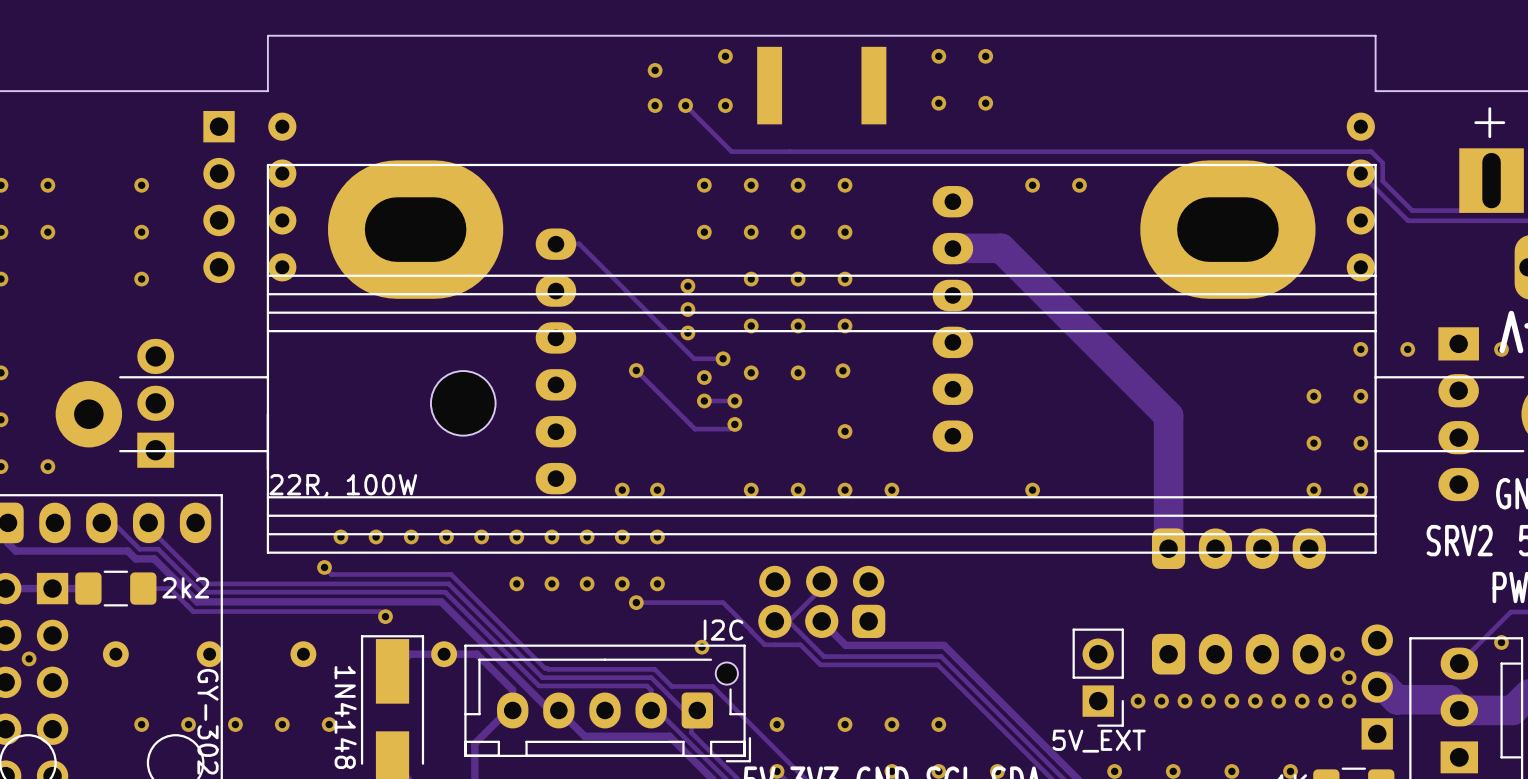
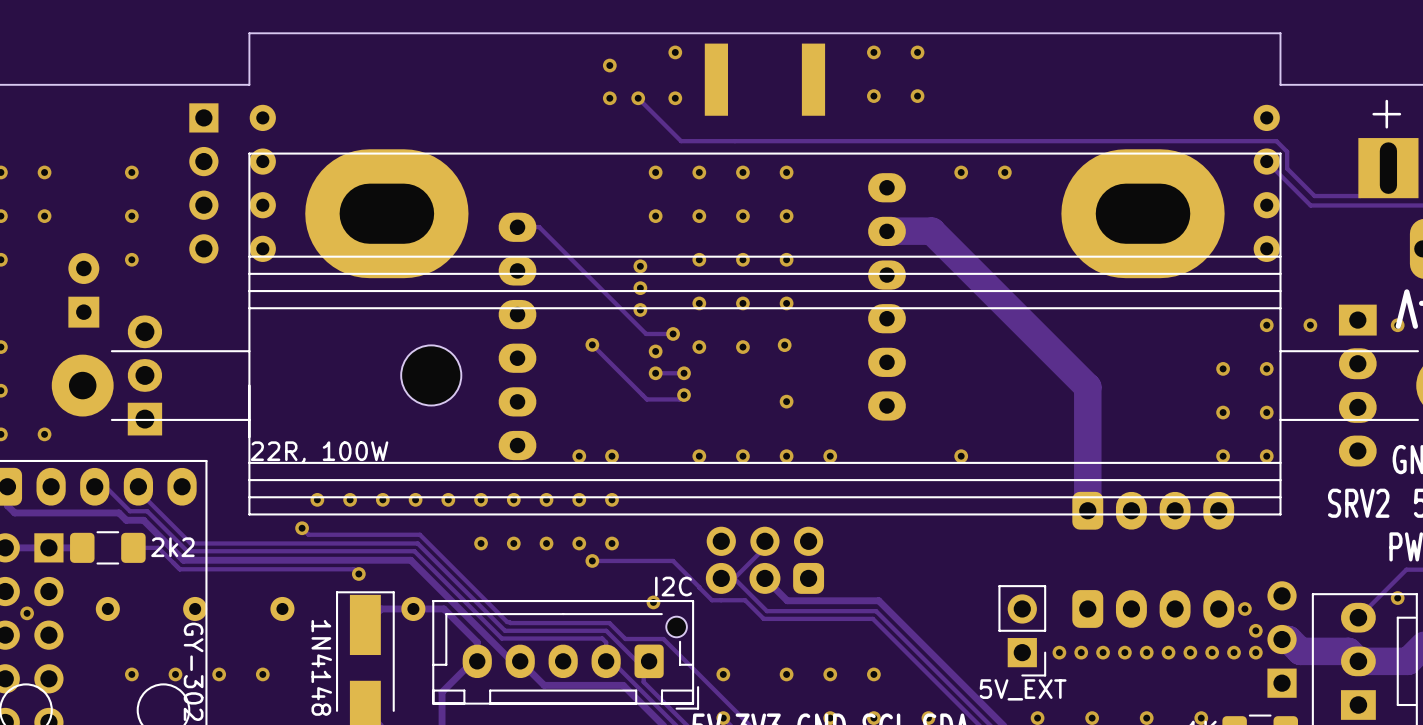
part: none -> (83, 290)
via: (329, 724) -> none

